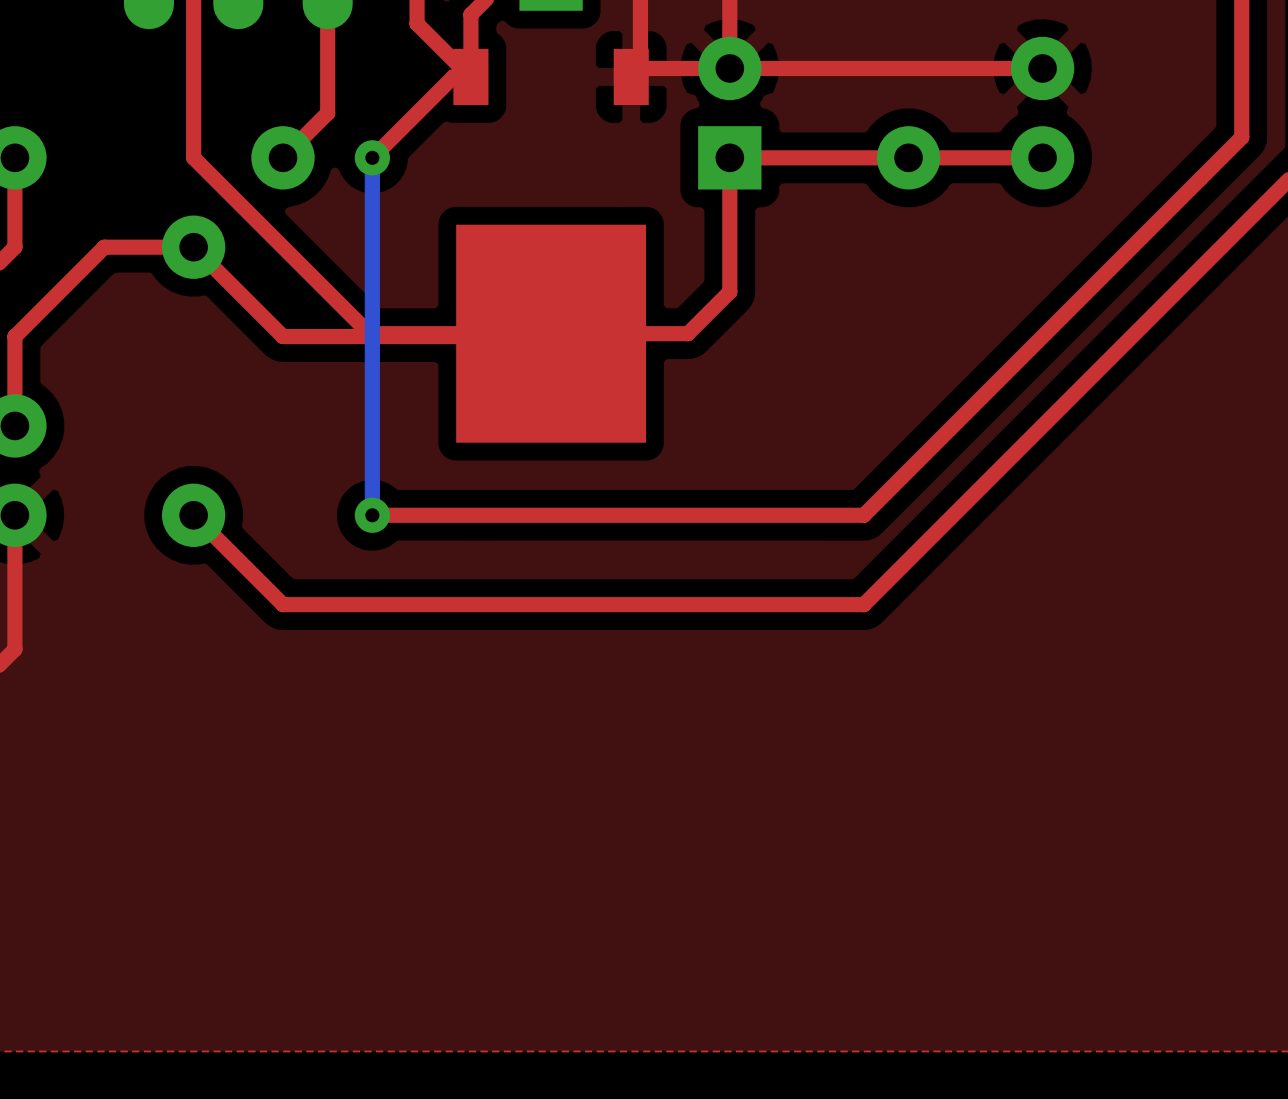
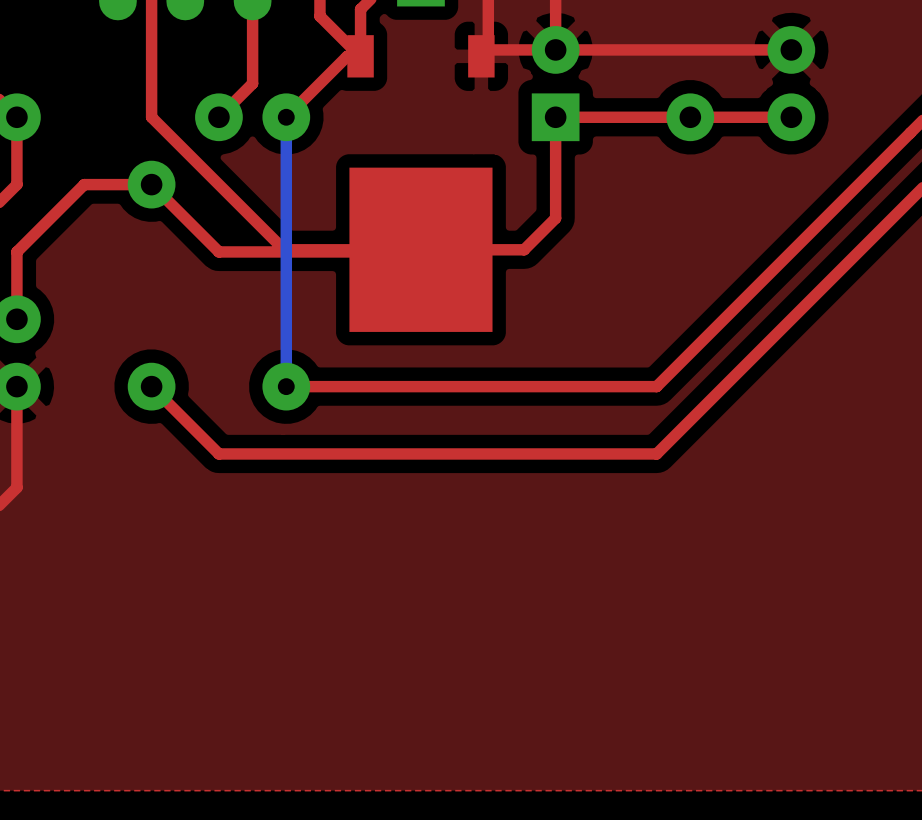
via size: [354, 140, 390, 176] -> [262, 93, 311, 142]
via size: [354, 497, 390, 533] -> [262, 362, 311, 411]

